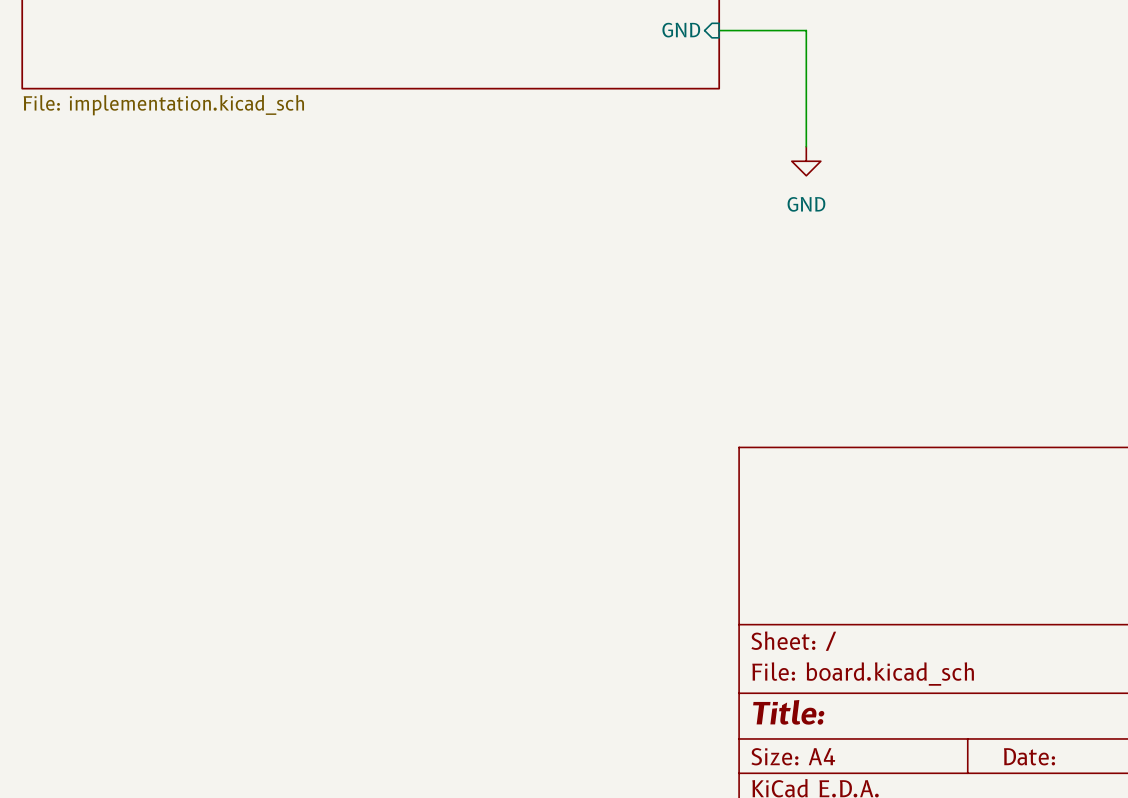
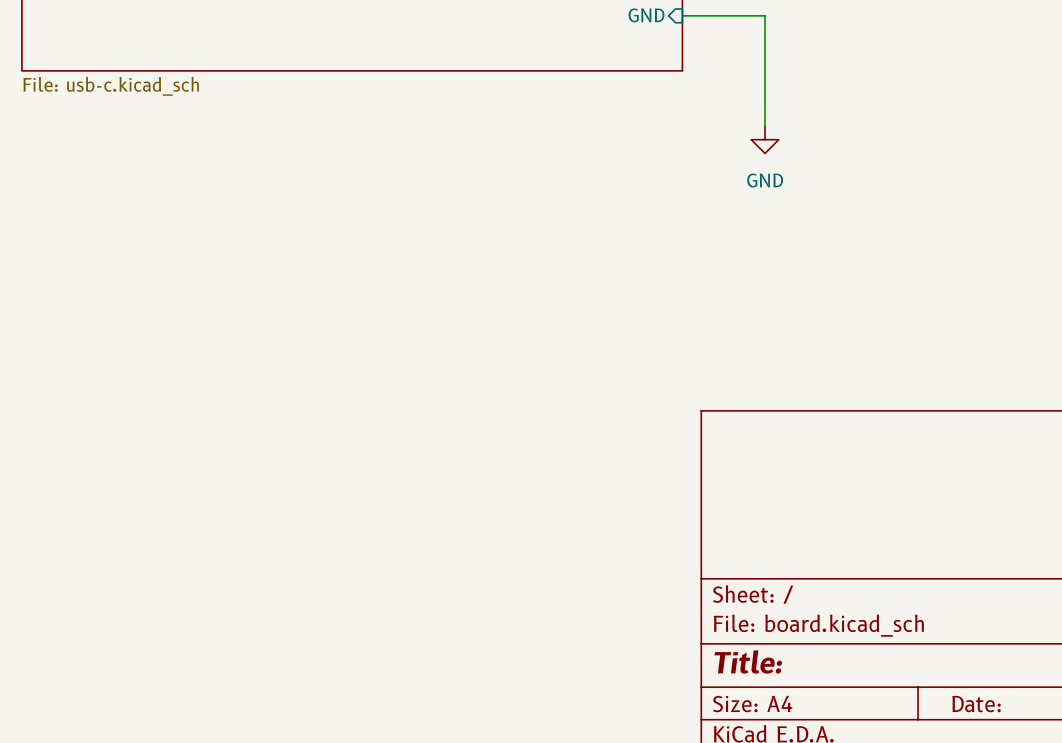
sheet value: File: implementation.kicad_sch (163, 105) -> File: usb-c.kicad_sch (111, 86)

